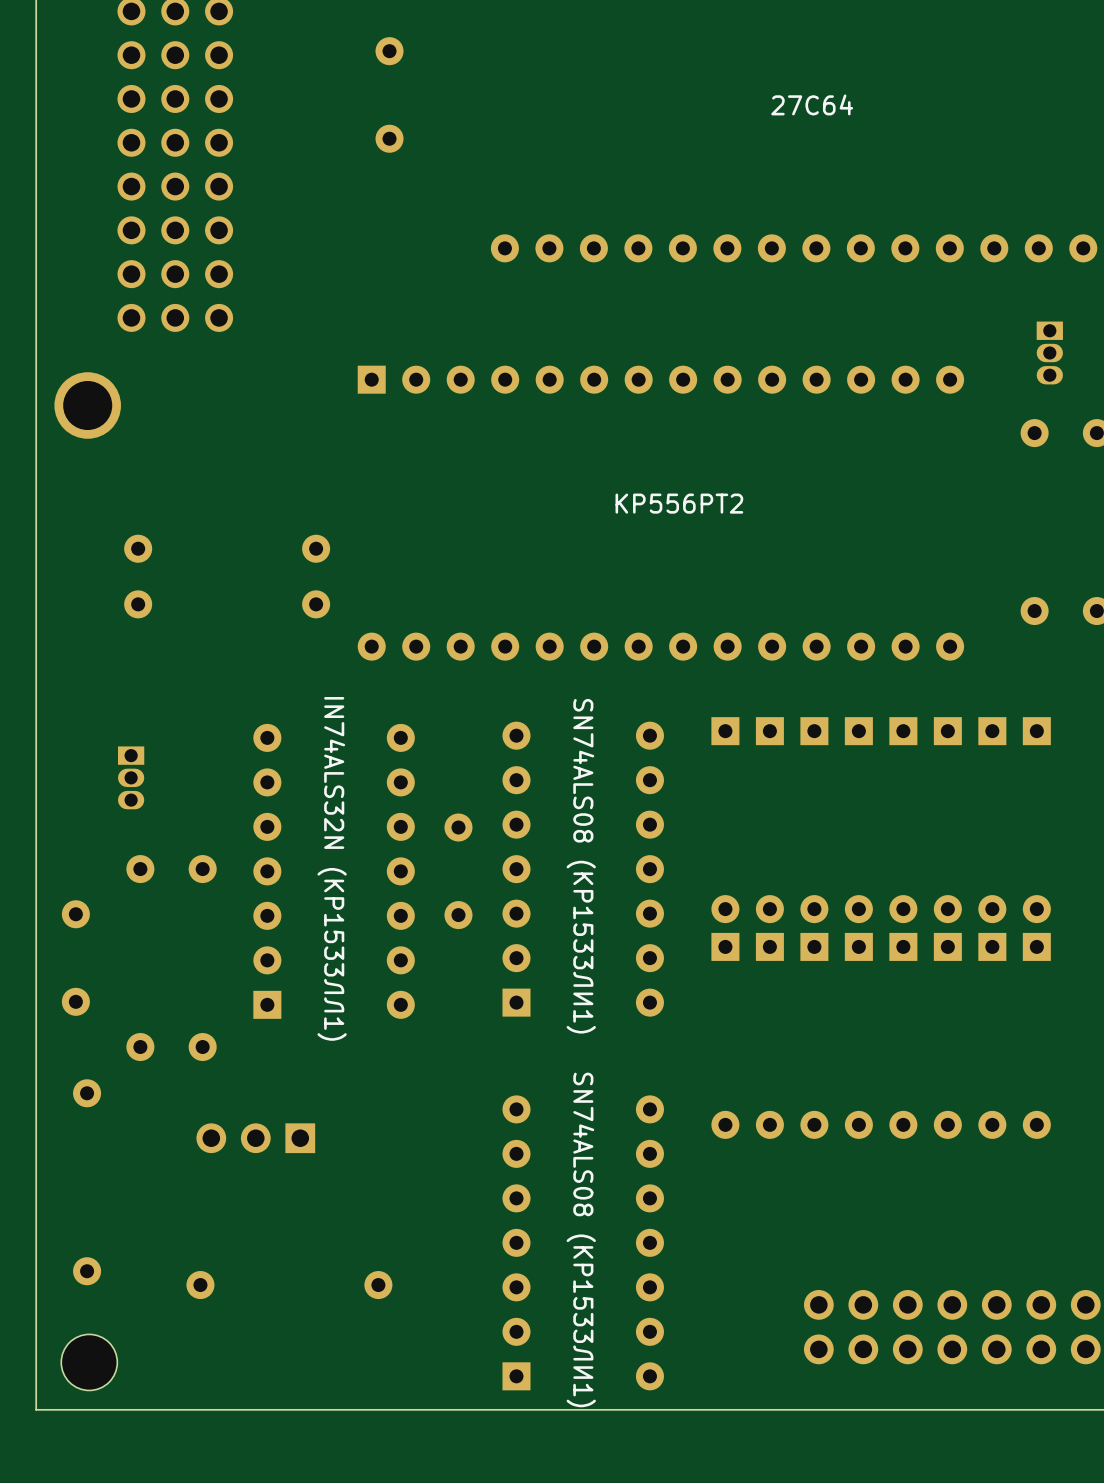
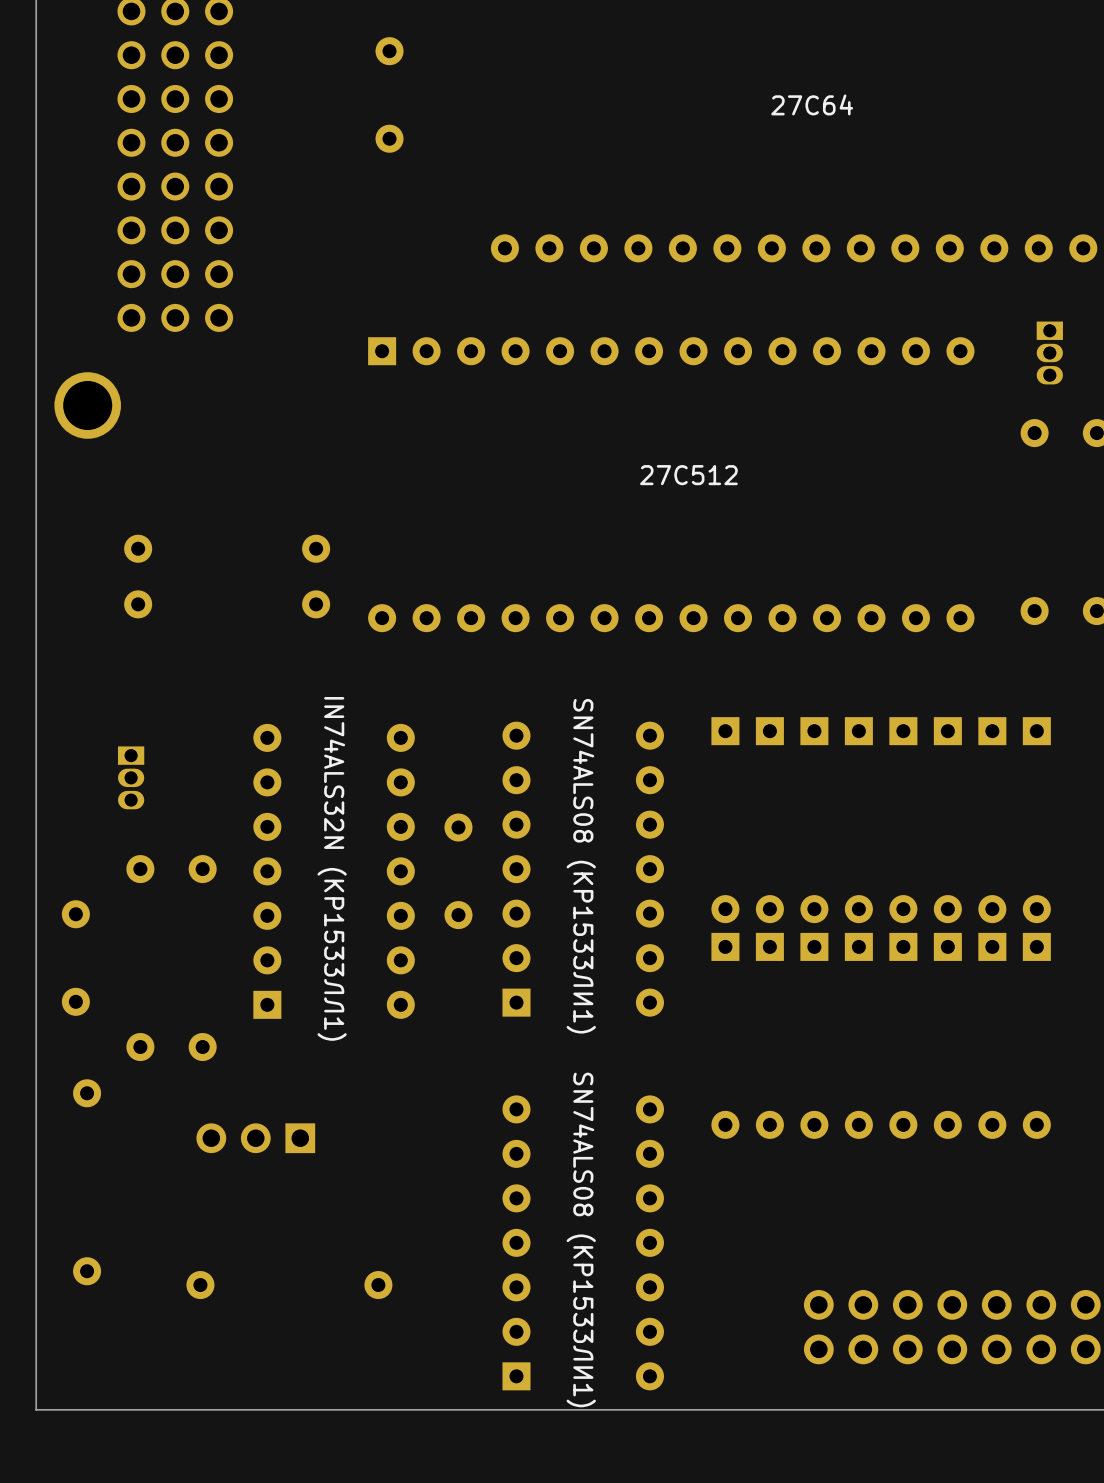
part: none -> 27C512 (671, 484)
part: КР556РТ2 (660, 513) -> none
part: (89, 1362) -> none

